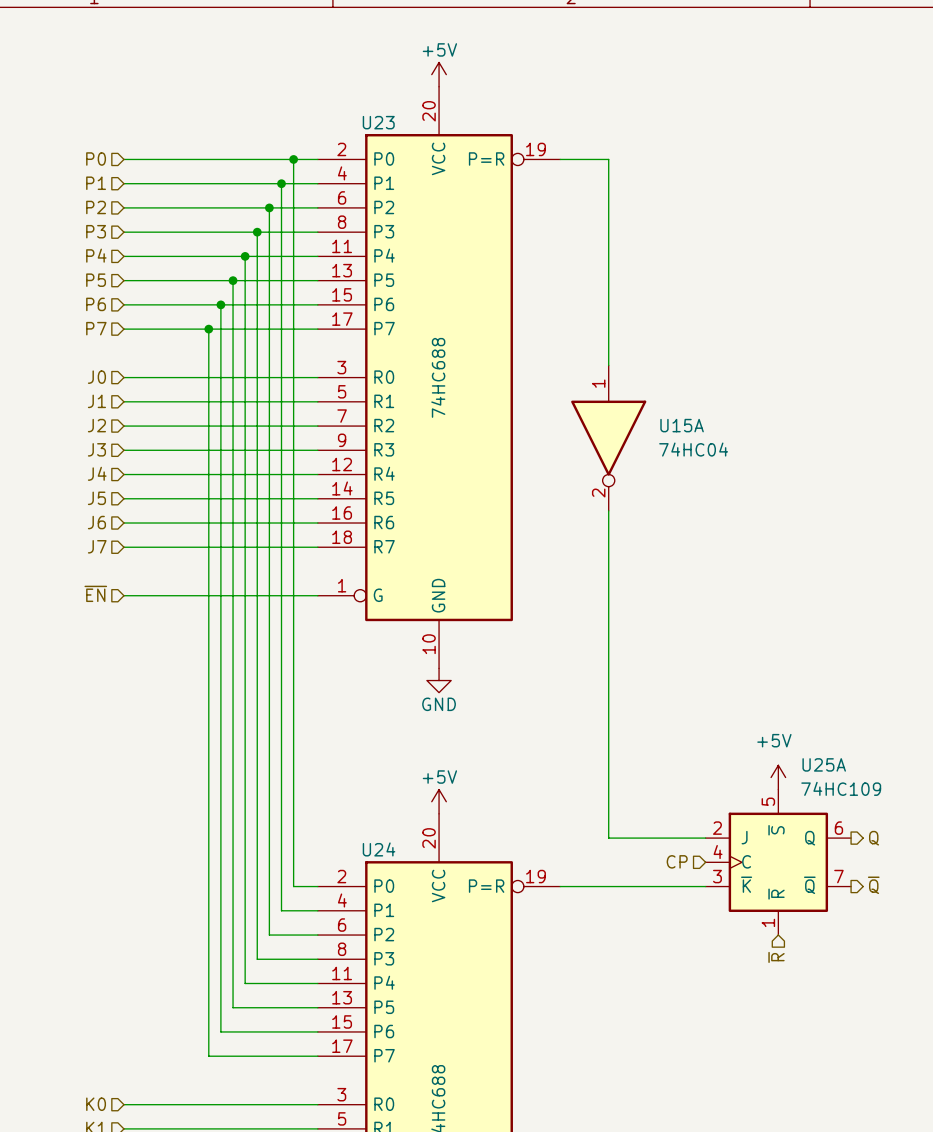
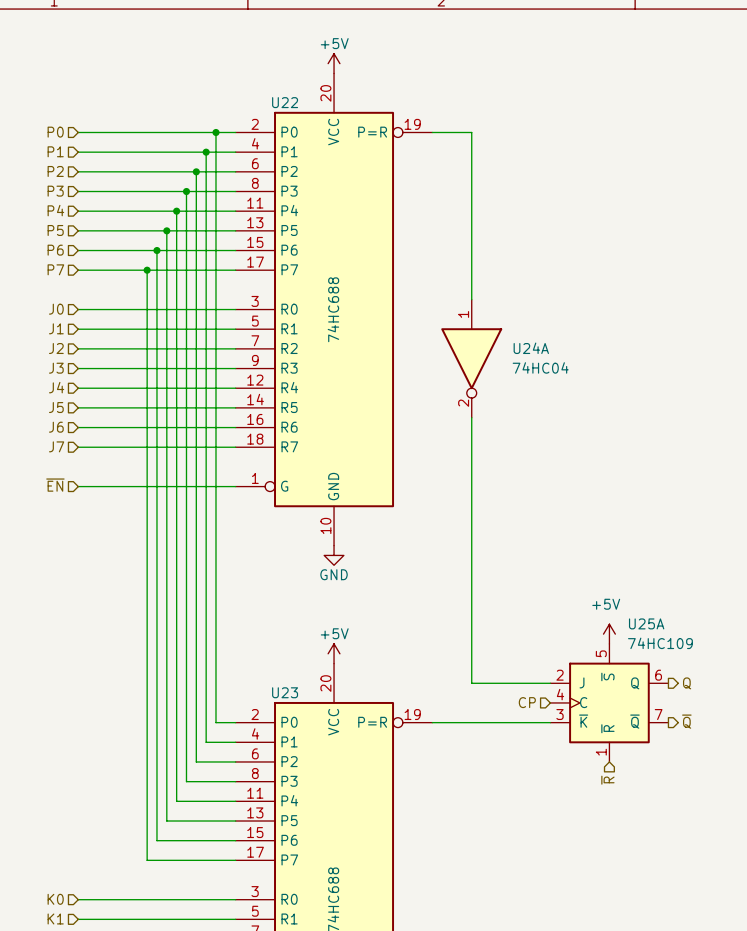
U23 name: U23 (378, 122) -> U22 (285, 102)
U15A name: U15A (682, 425) -> U24A (531, 348)
U24 name: U24 (379, 849) -> U23 (285, 692)

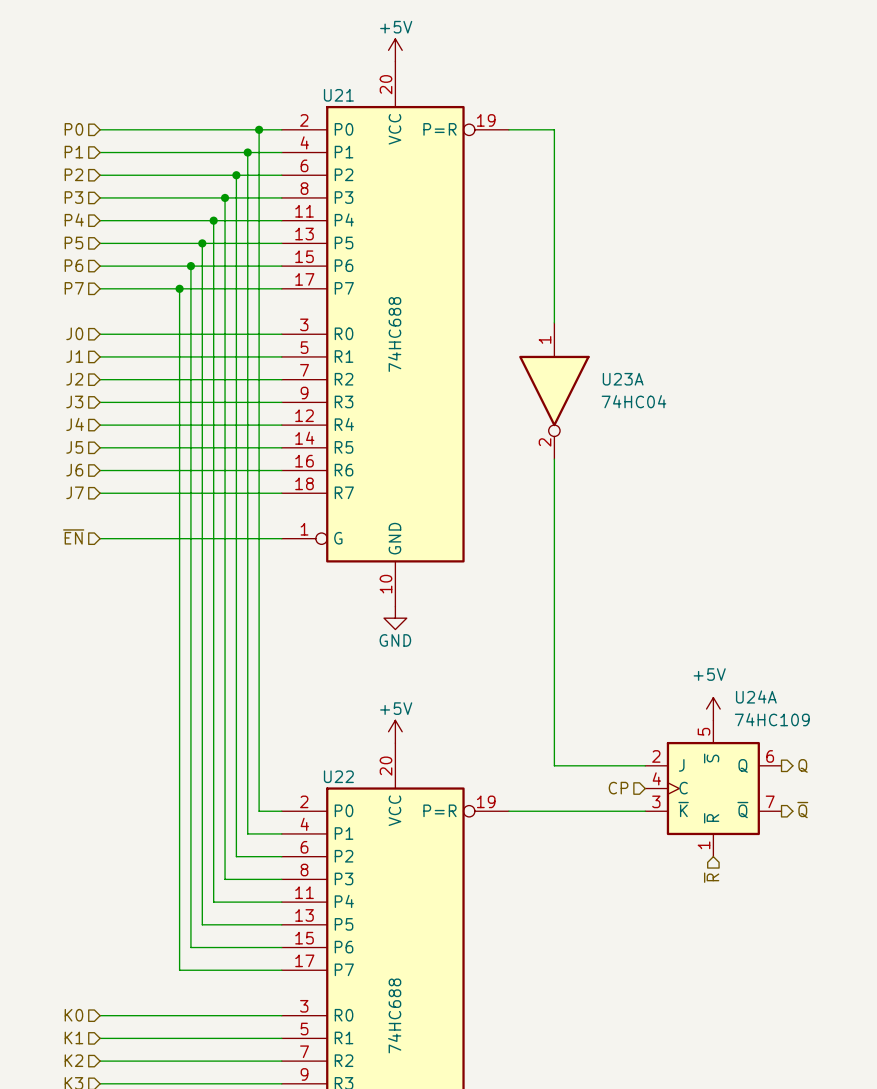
U22 name: U22 (285, 102) -> U21 (338, 95)
U24A name: U24A (531, 348) -> U23A (623, 379)
U25A name: U25A (646, 623) -> U24A (756, 696)
U23 name: U23 (285, 692) -> U22 (338, 776)

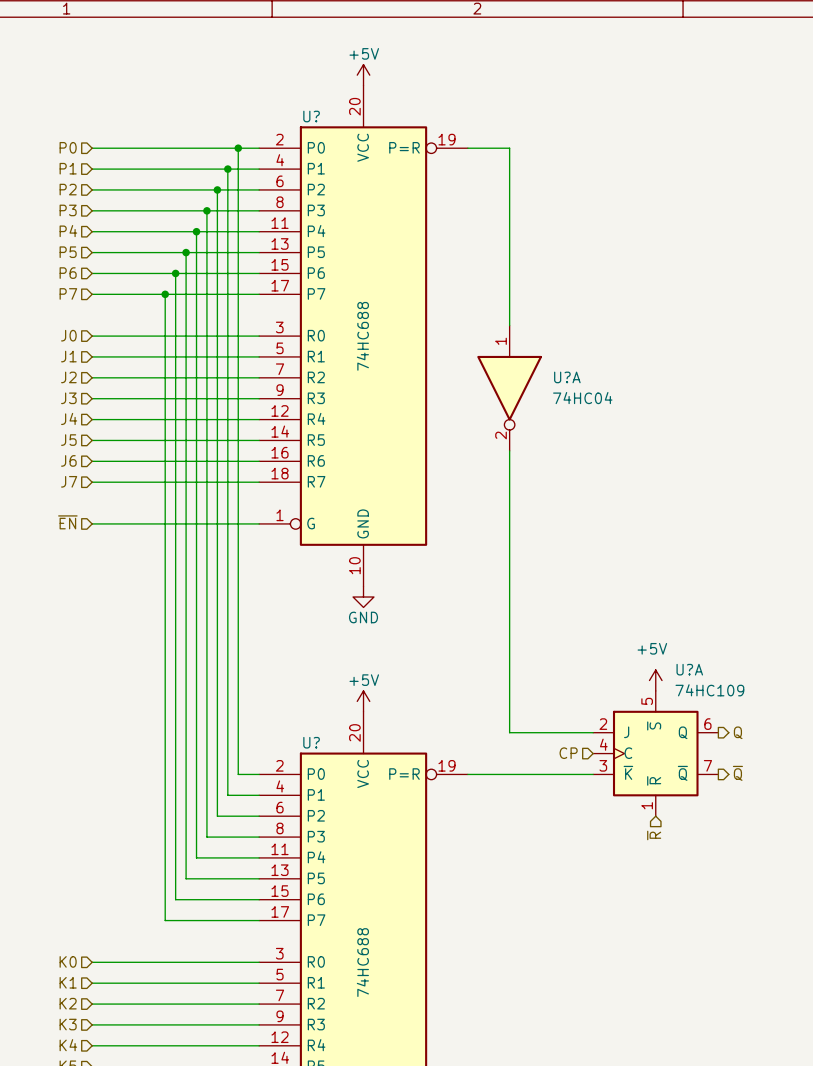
U21 name: U21 (338, 95) -> U? (311, 116)
U23A name: U23A (623, 379) -> U?A (567, 377)
U24A name: U24A (756, 696) -> U?A (689, 669)
U22 name: U22 (338, 776) -> U? (311, 742)

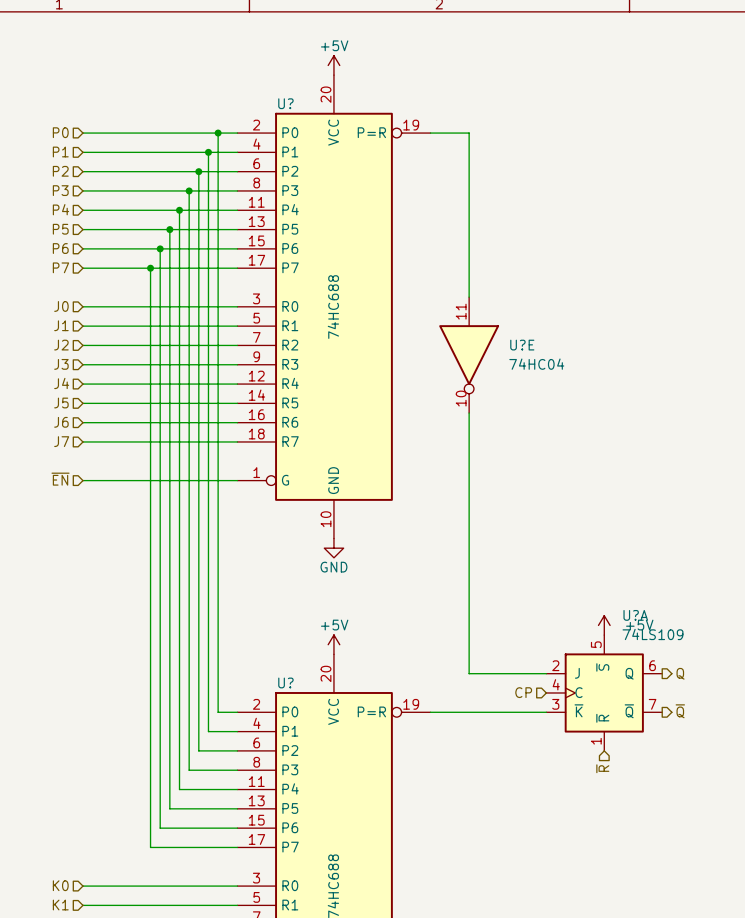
U?A pin number: 1 (501, 341) -> 11 (461, 311)
U?A name: U?A (567, 377) -> U?E (522, 345)
U?A pin number: 2 (501, 435) -> 10 (461, 398)
power symbol text position: +5V (652, 648) -> +5V (639, 625)
U?A value: 74HC109 (709, 690) -> 74LS109 (652, 634)

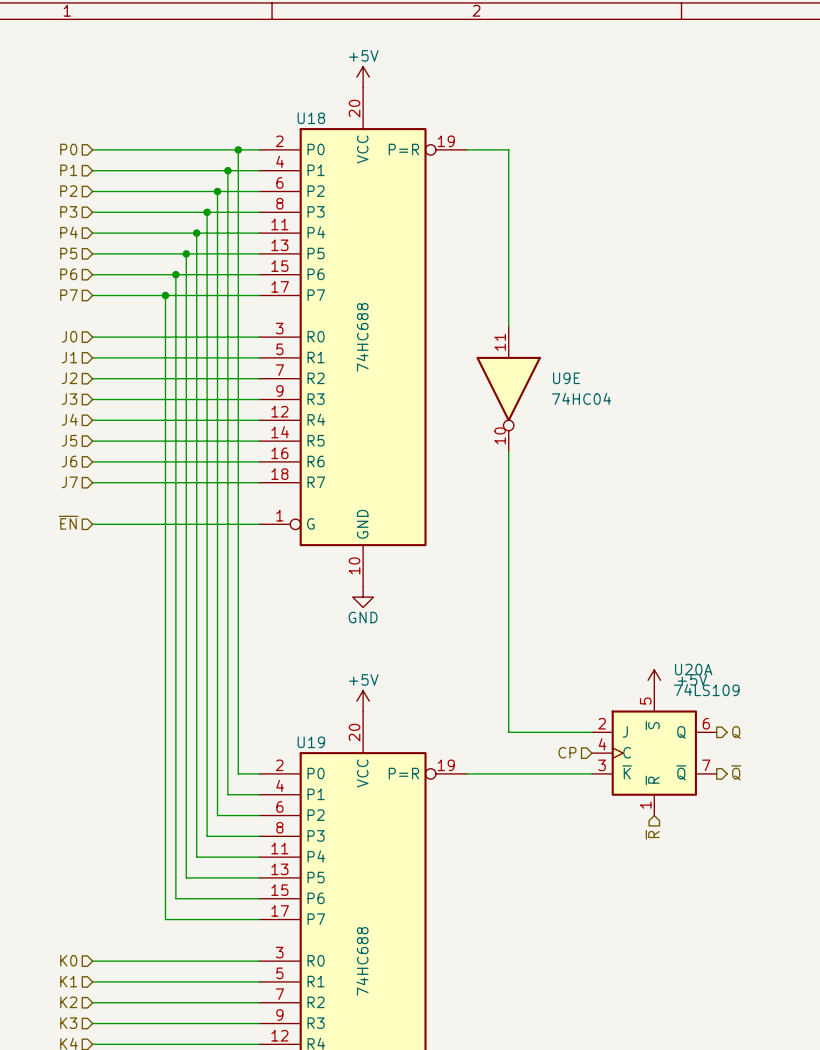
U? name: U? (285, 103) -> U18 (311, 118)
U?E name: U?E (522, 345) -> U9E (566, 378)
U?A name: U?A (635, 615) -> U20A (693, 669)
U? name: U? (285, 682) -> U19 (311, 742)

